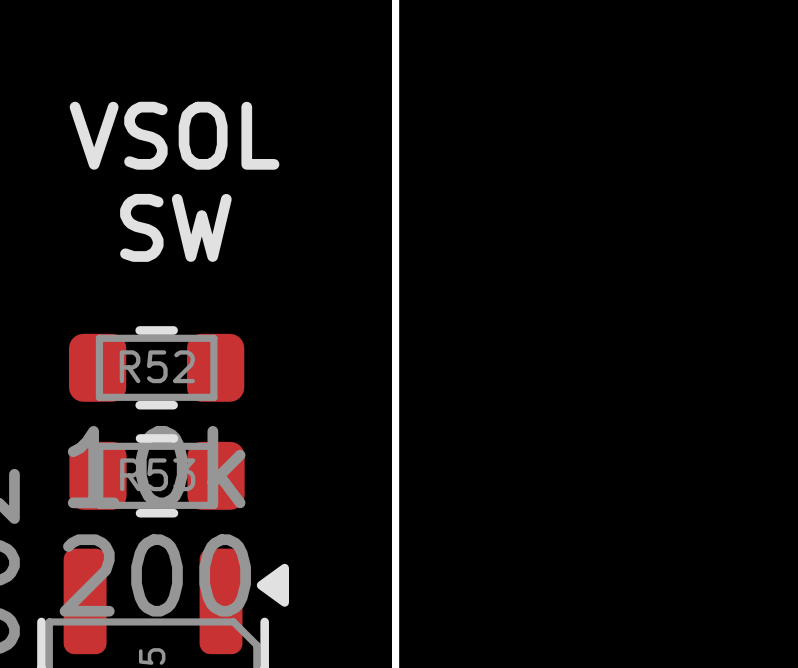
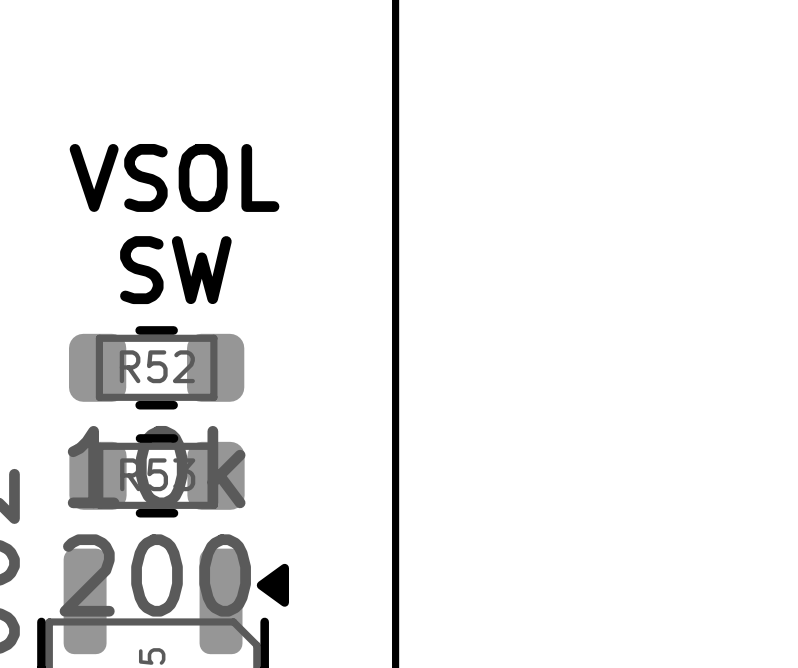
text position: VSOL (174, 135) -> VSOL (174, 177)
text position: SW (175, 227) -> SW (175, 270)

